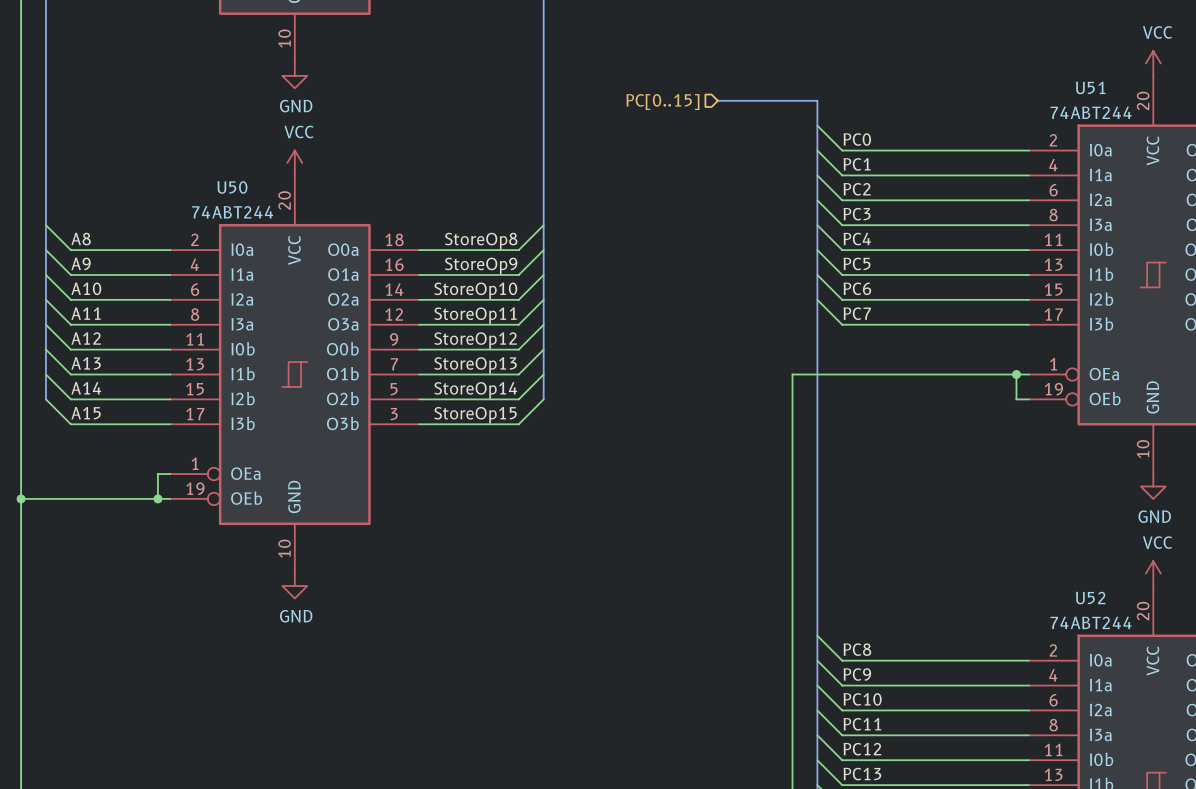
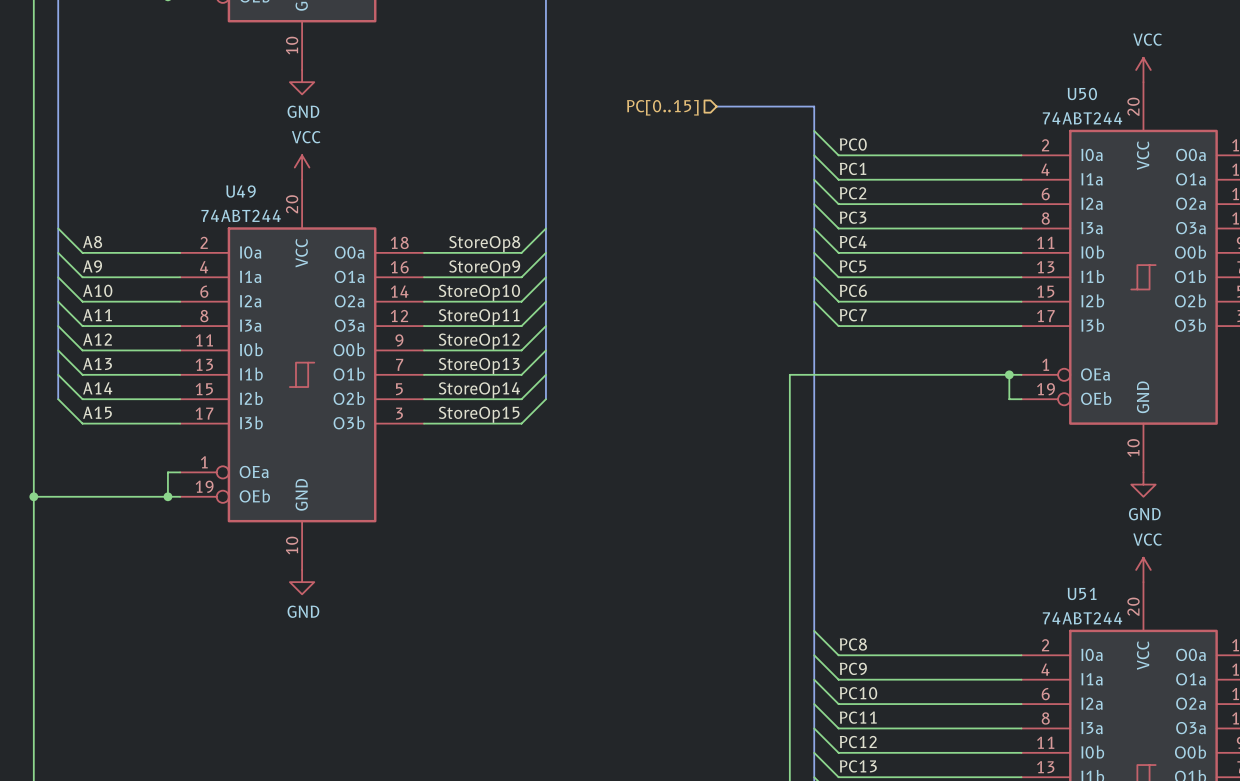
U51 name: U51 (1090, 87) -> U50 (1082, 93)
U50 name: U50 (232, 187) -> U49 (241, 191)
U52 name: U52 (1090, 598) -> U51 (1082, 593)

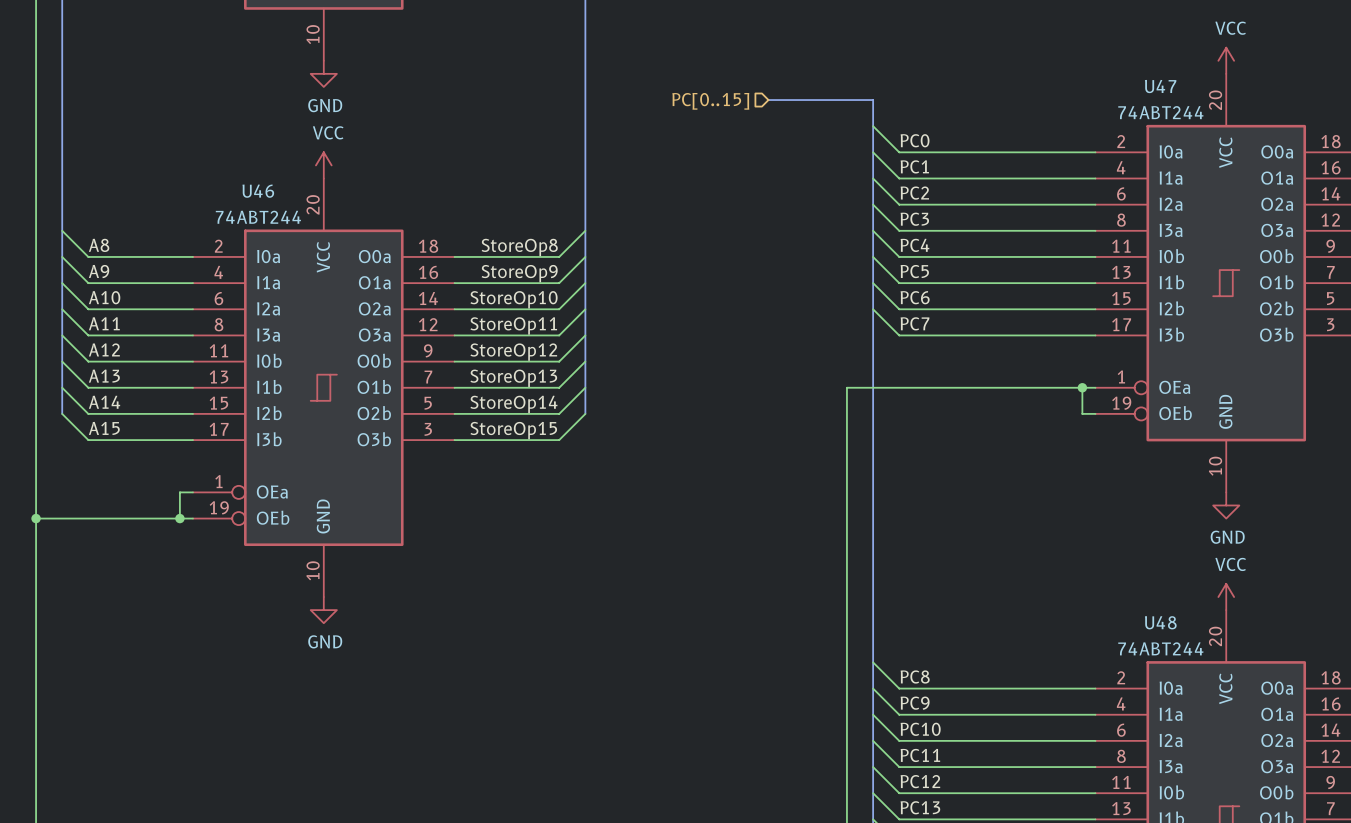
U50 name: U50 (1082, 93) -> U47 (1160, 86)
U49 name: U49 (241, 191) -> U46 (258, 191)
U51 name: U51 (1082, 593) -> U48 (1160, 622)

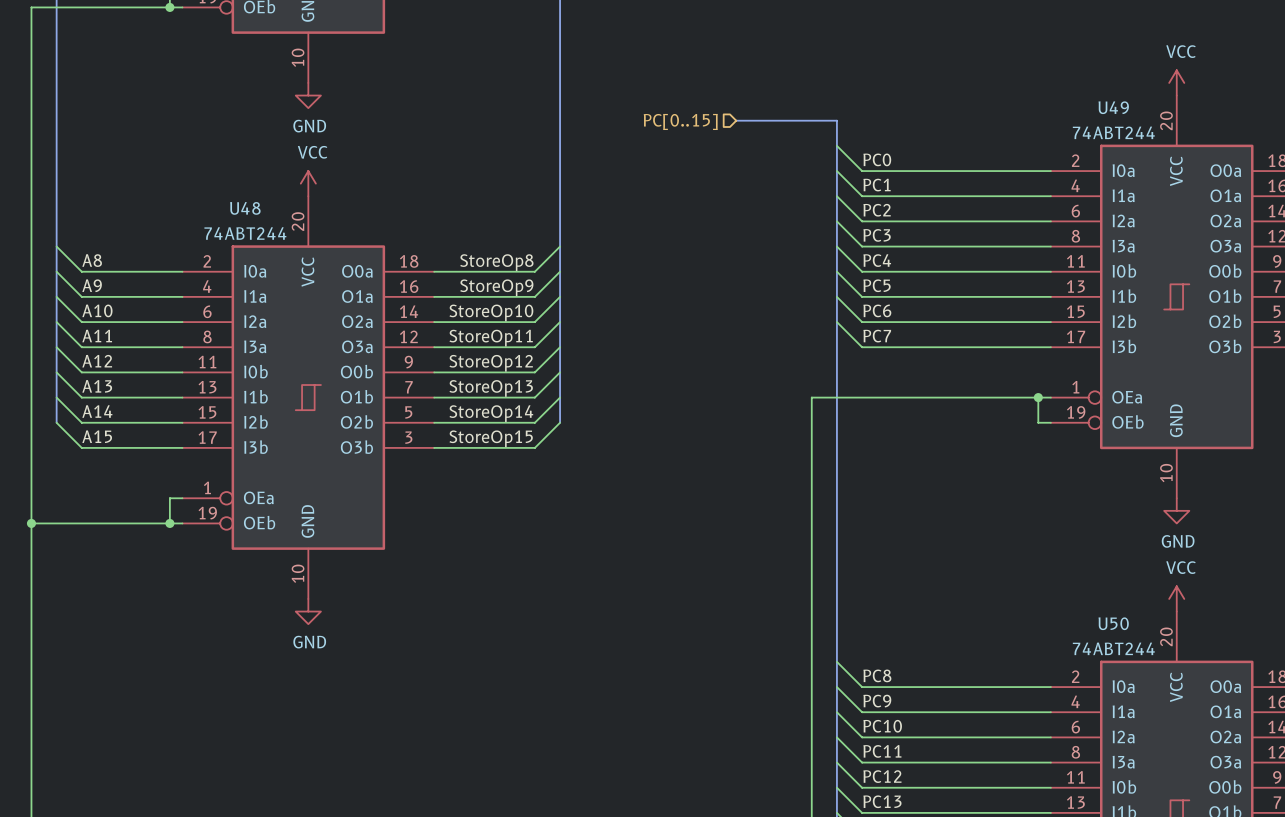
U47 name: U47 (1160, 86) -> U49 (1113, 107)
U46 name: U46 (258, 191) -> U48 (245, 208)
U48 name: U48 (1160, 622) -> U50 (1113, 623)

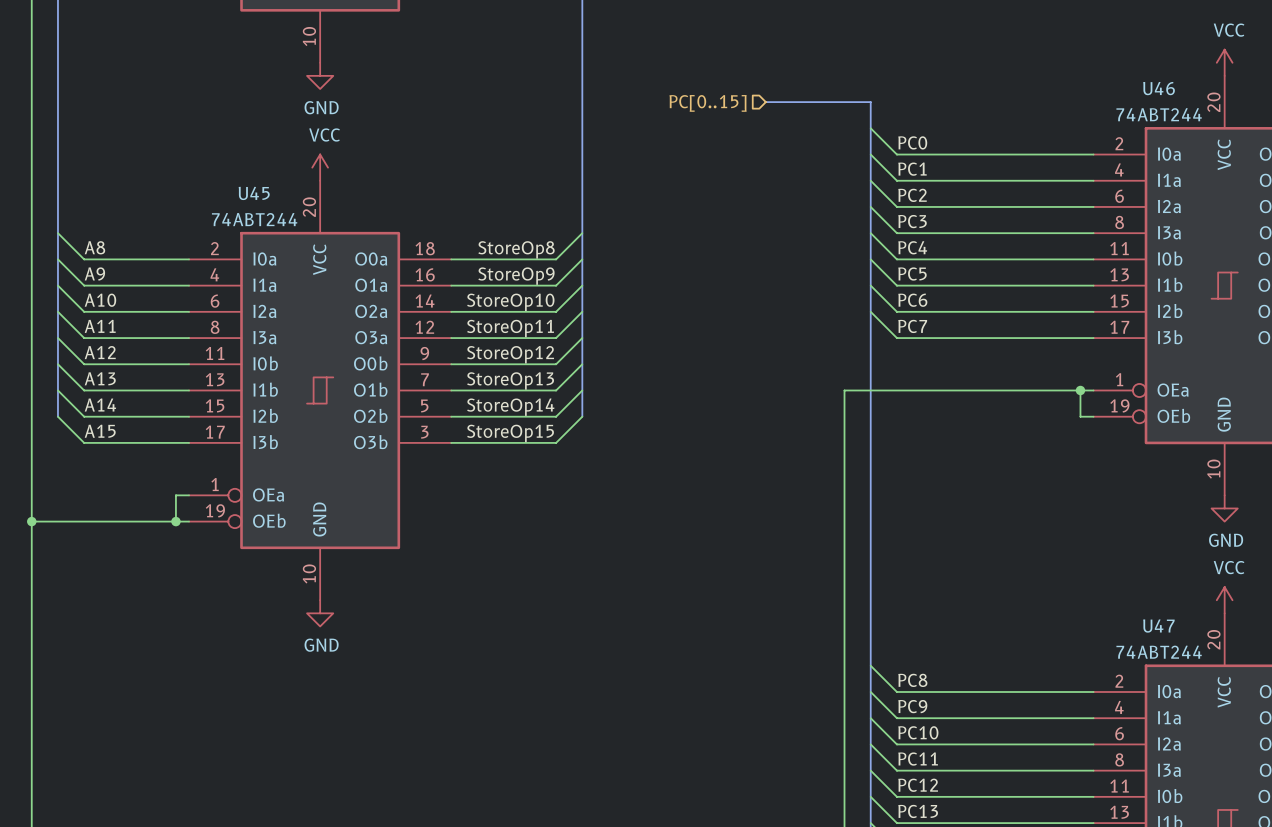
U49 name: U49 (1113, 107) -> U46 (1159, 88)
U48 name: U48 (245, 208) -> U45 (254, 193)
U50 name: U50 (1113, 623) -> U47 (1158, 626)

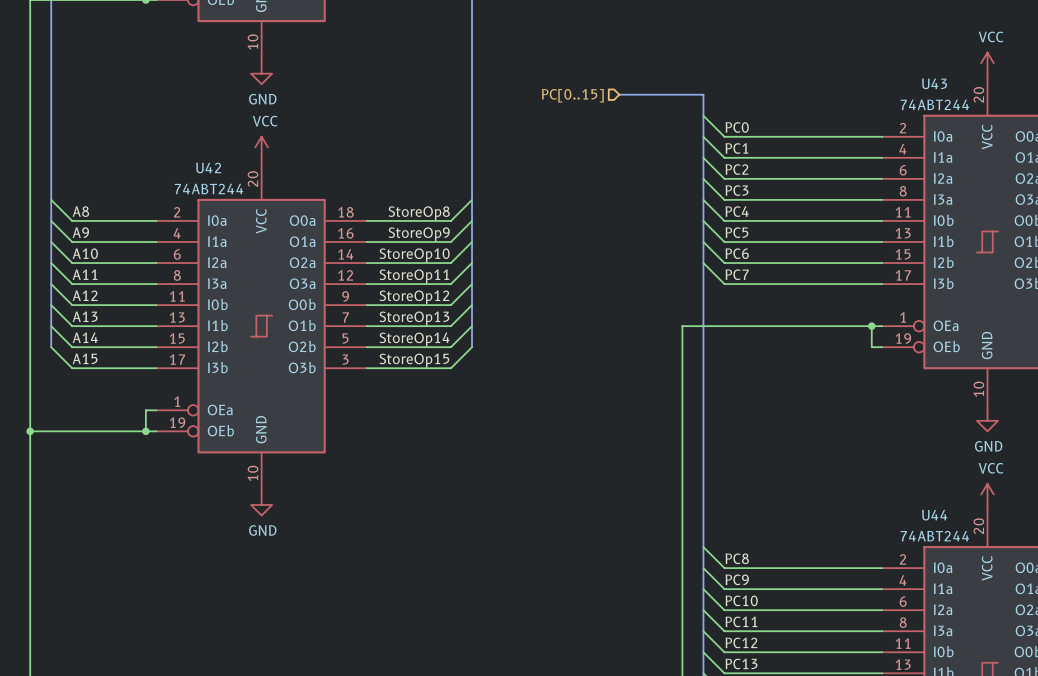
U46 name: U46 (1159, 88) -> U43 (934, 83)
U45 name: U45 (254, 193) -> U42 (208, 168)
U47 name: U47 (1158, 626) -> U44 (934, 515)

